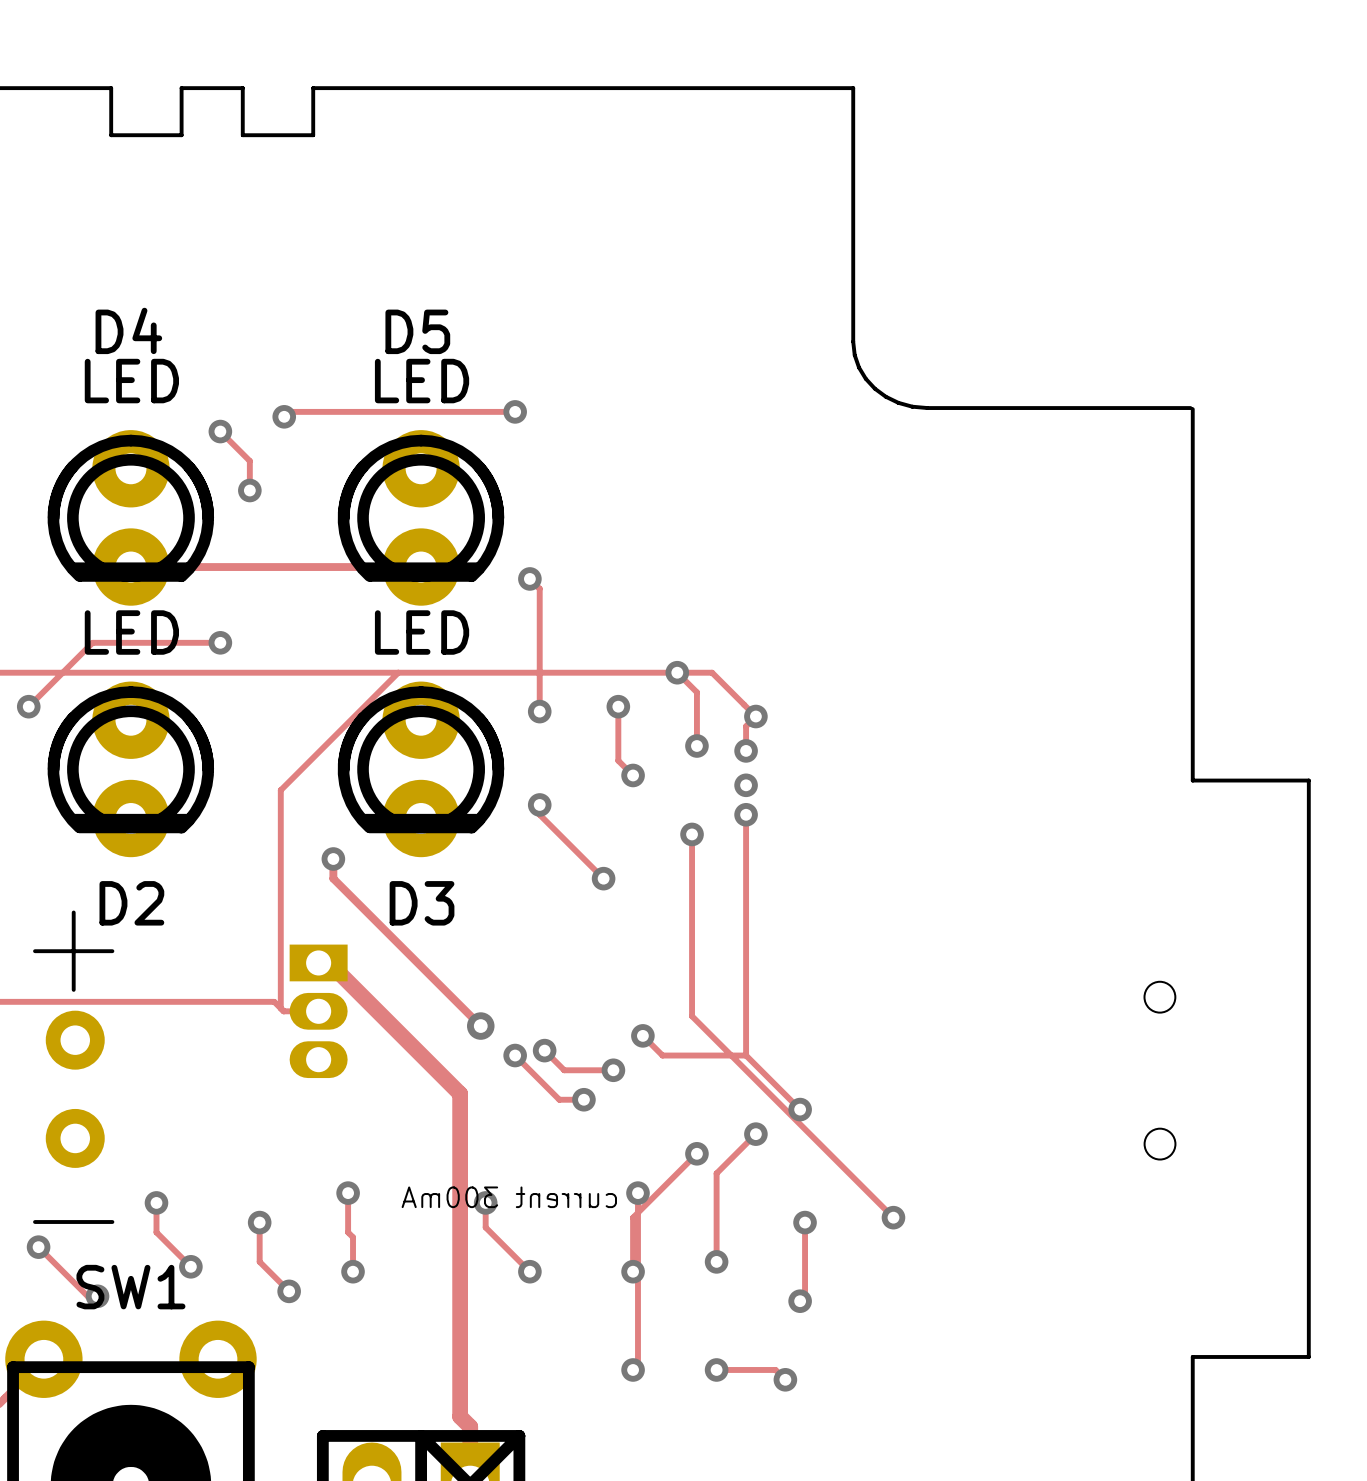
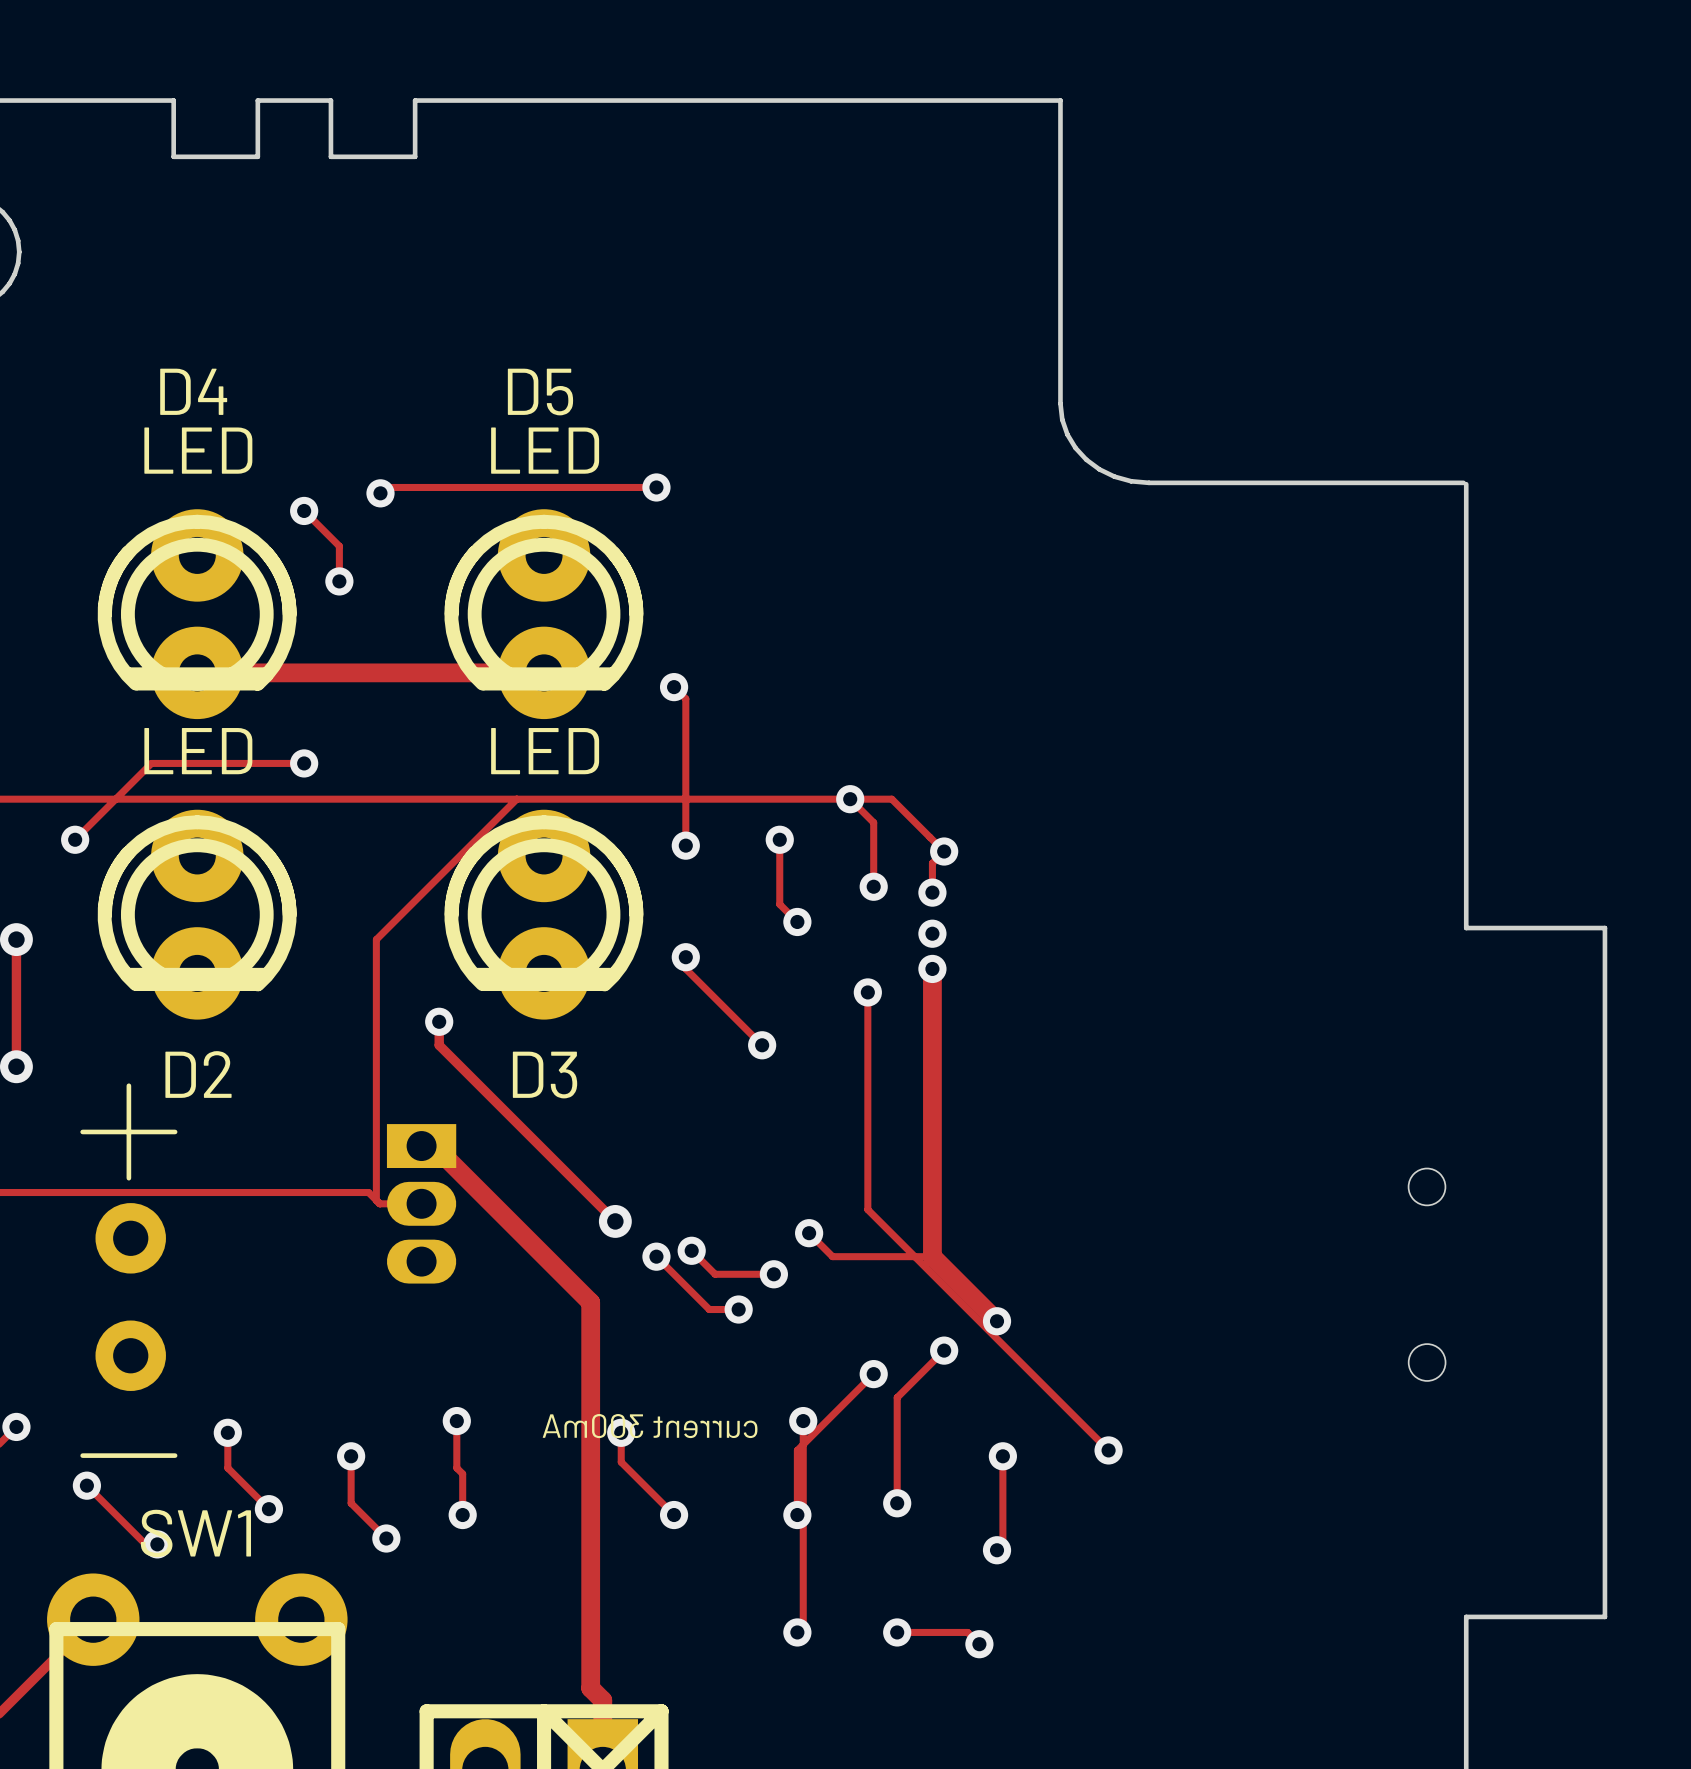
track width: thin (130, 567) (421, 567) -> thick (197, 672) (544, 672)
track width: thin (746, 814) (746, 1055) (800, 1109) -> thick (932, 968) (932, 1256) (997, 1321)

